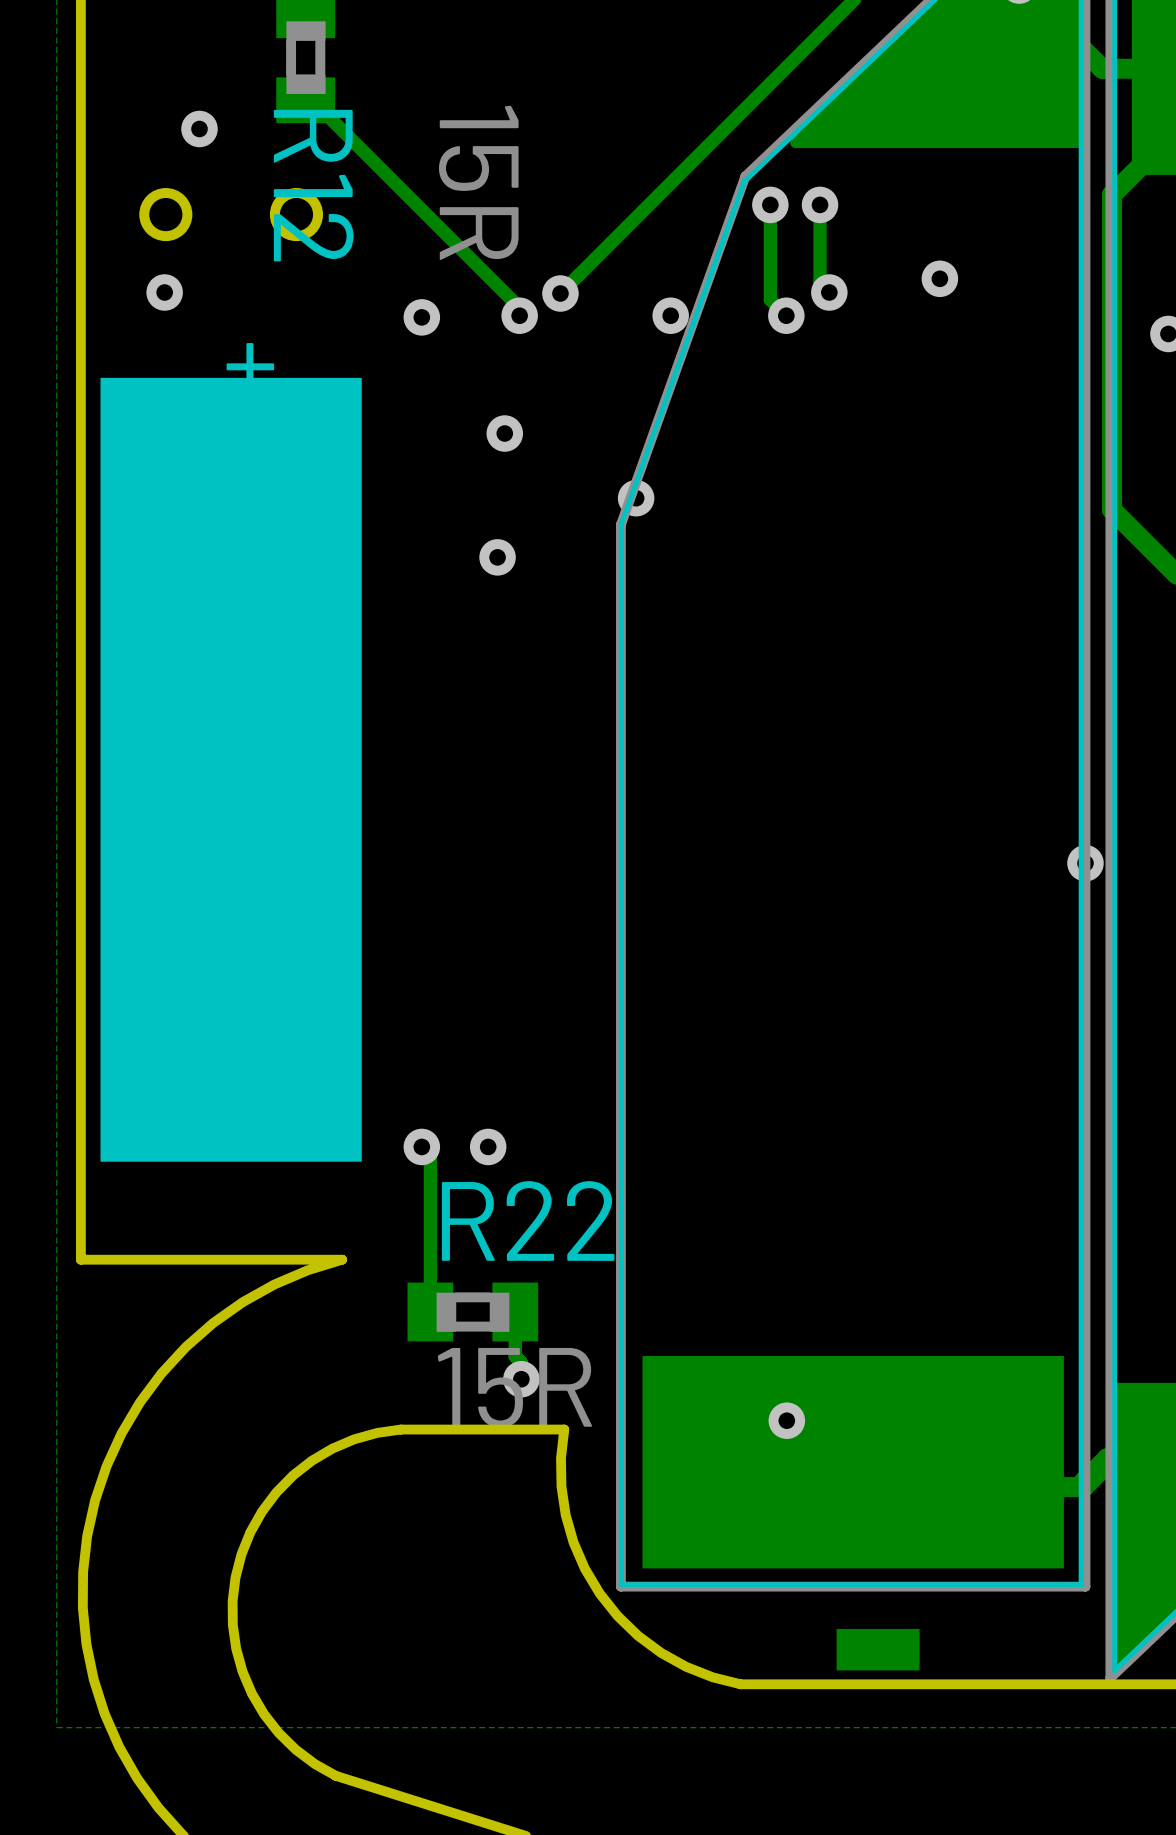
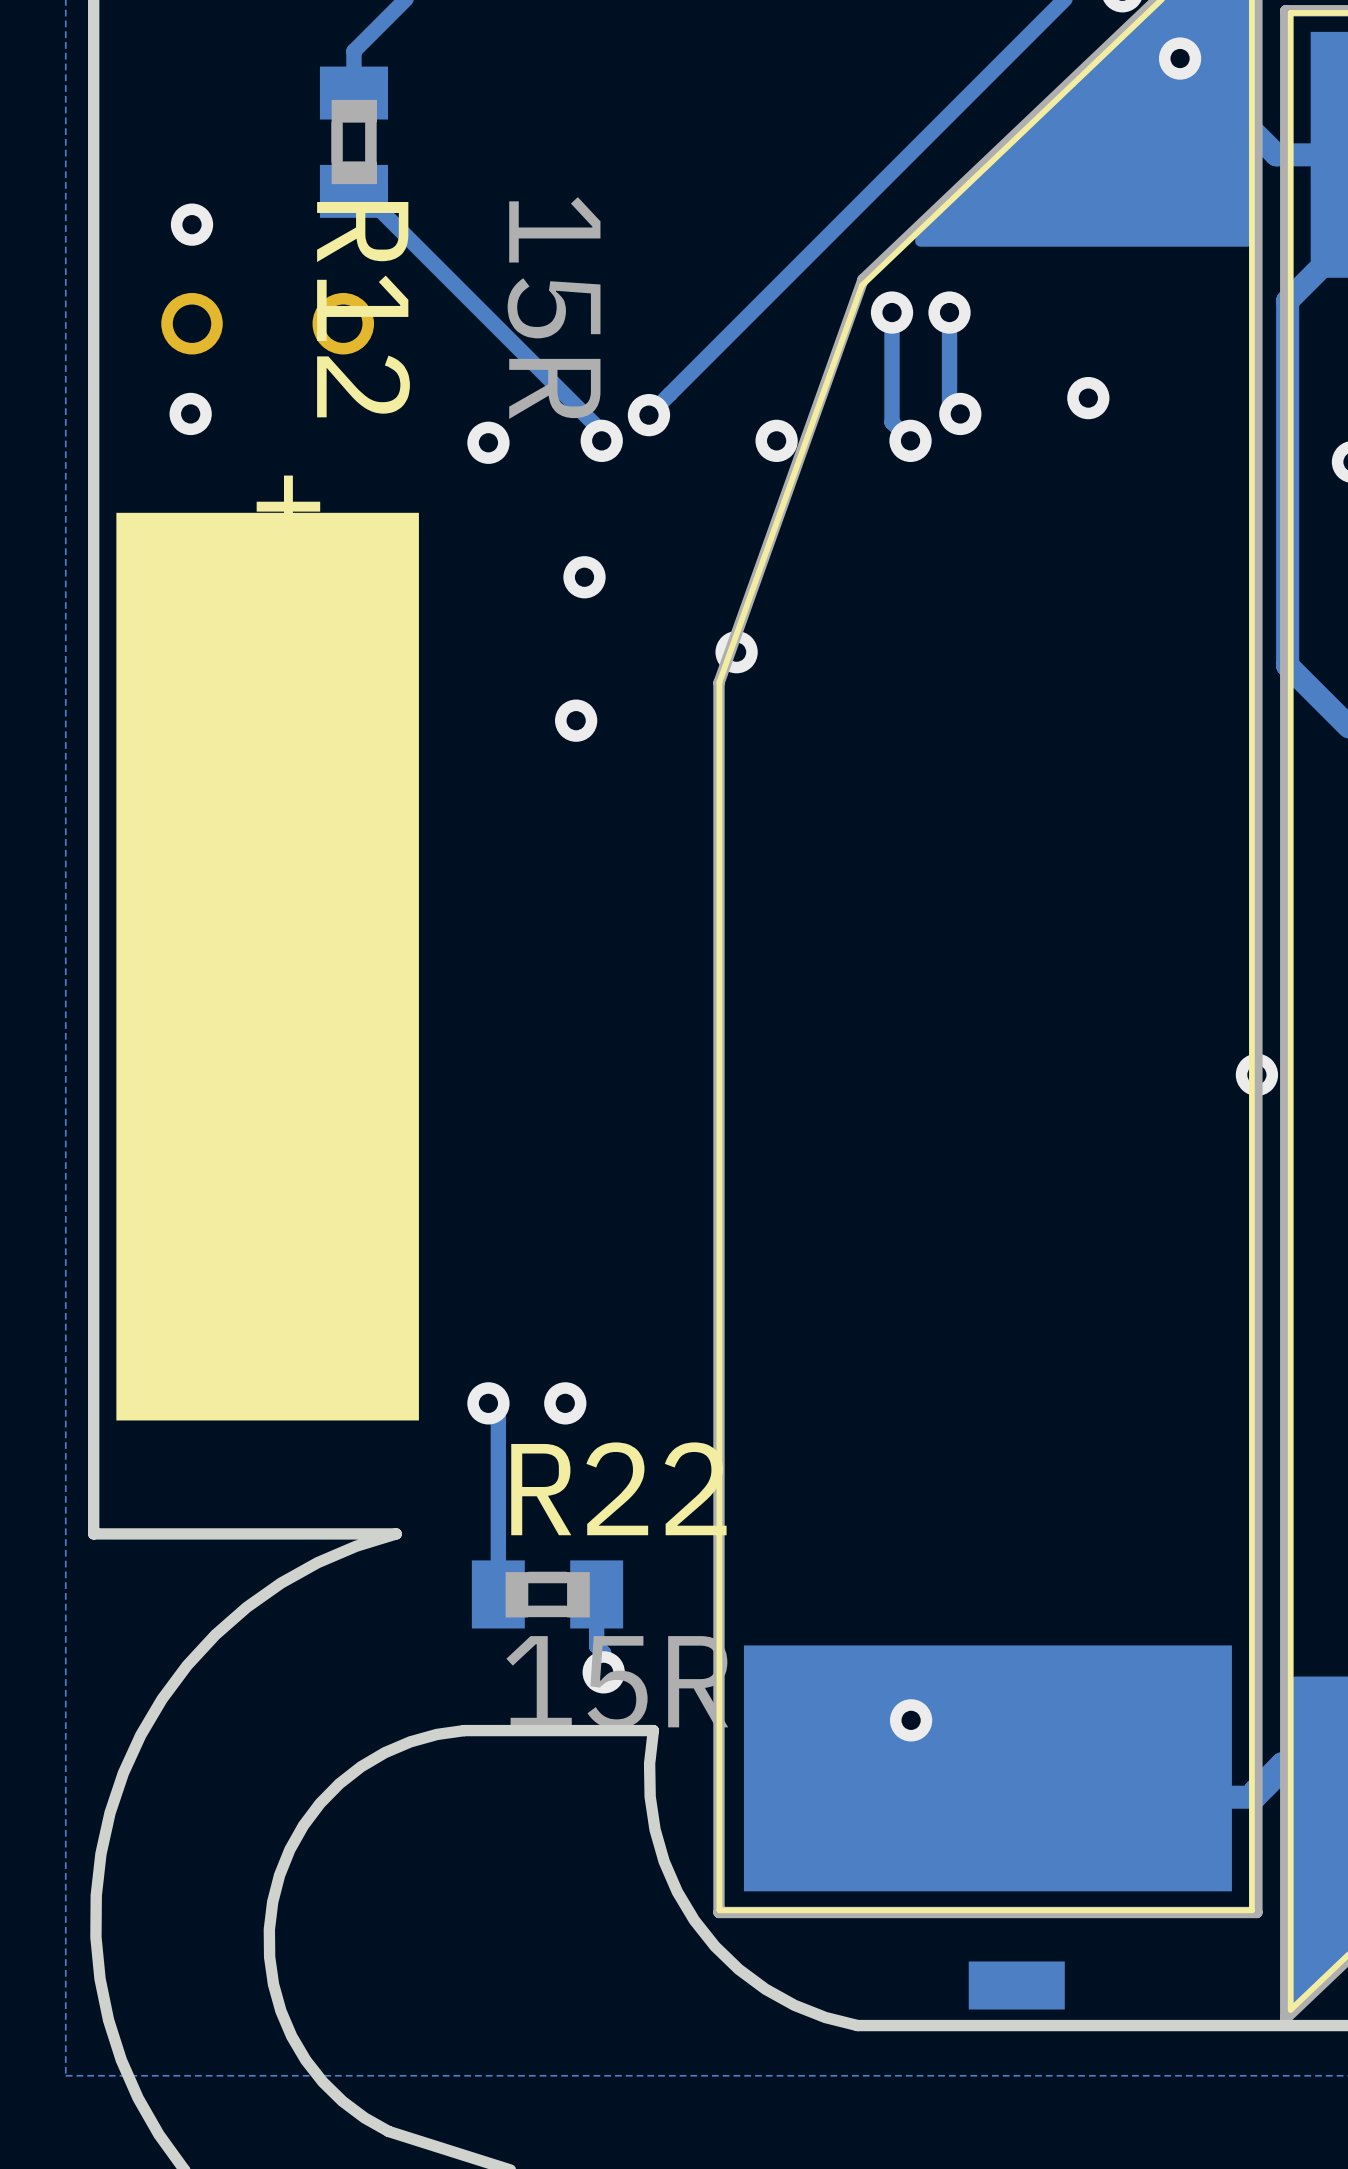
via position: (199, 129) -> (192, 224)

